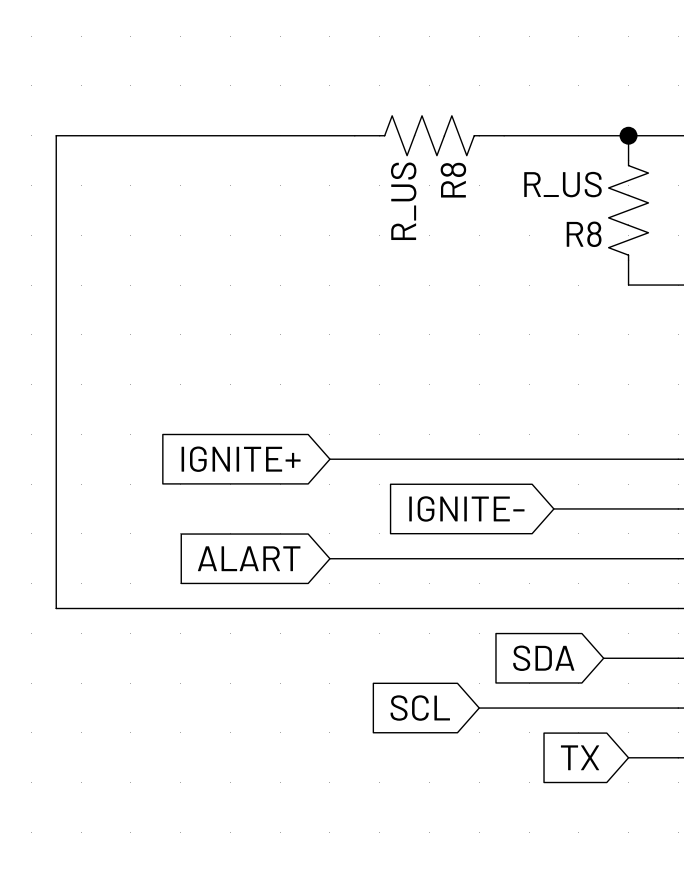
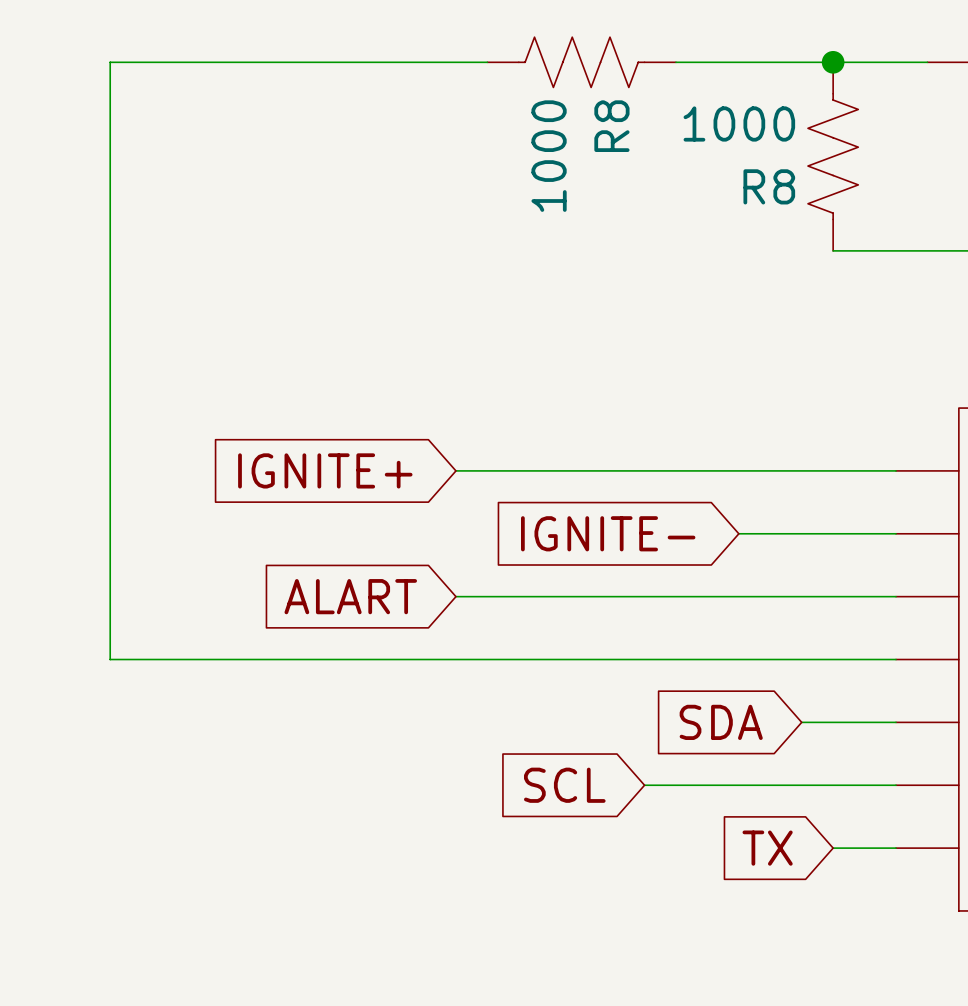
R8 value: R_US (563, 184) -> 1000 (739, 124)
R8 value: R_US (403, 201) -> 1000 (549, 156)

